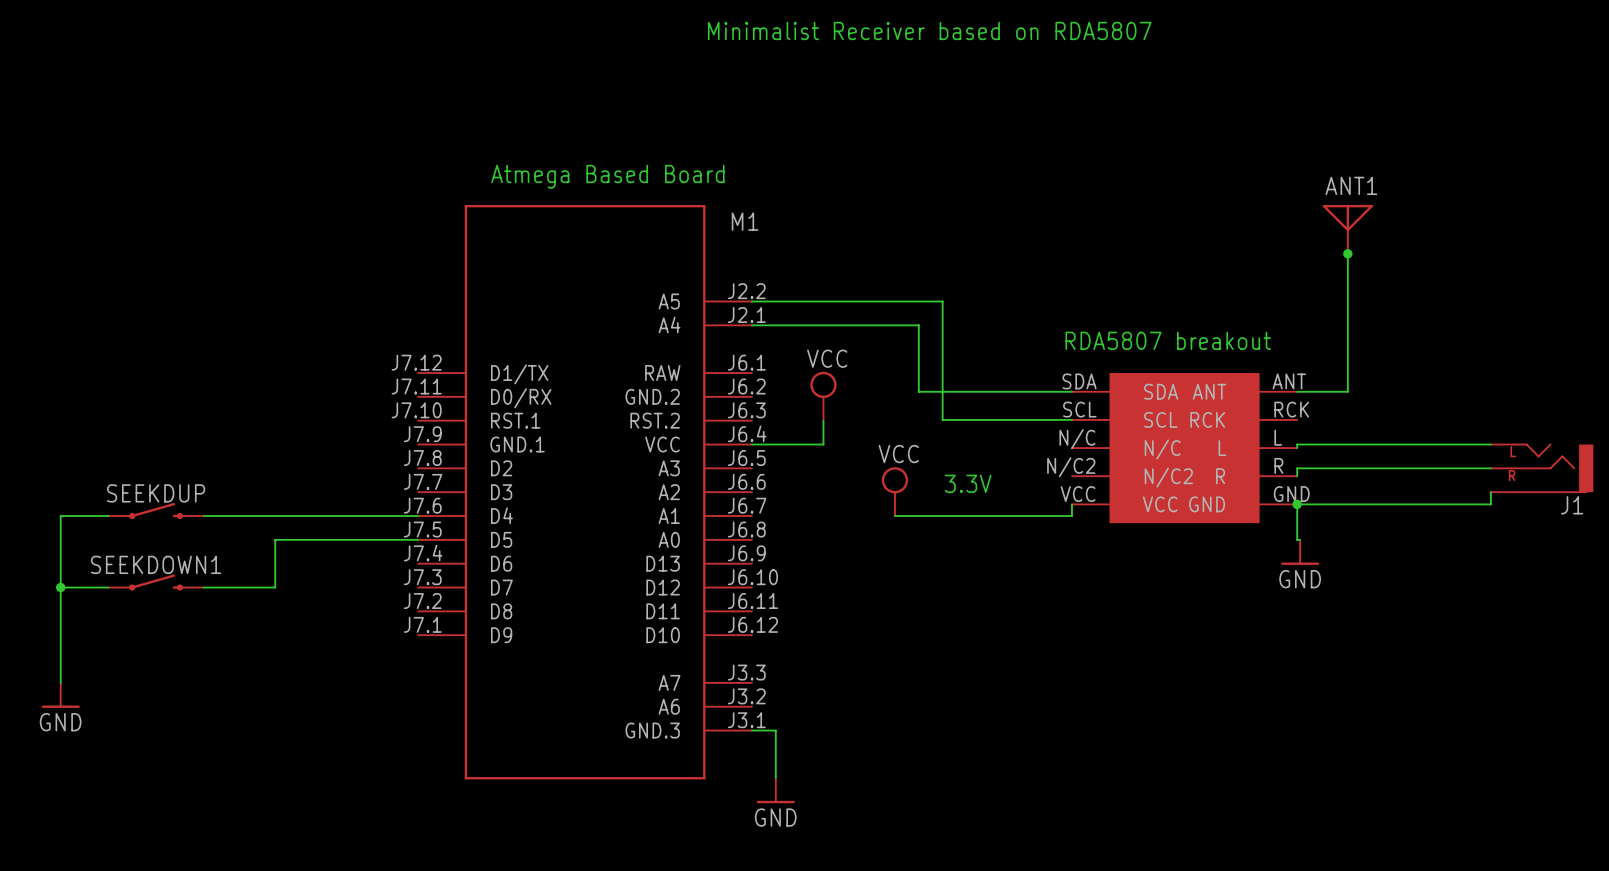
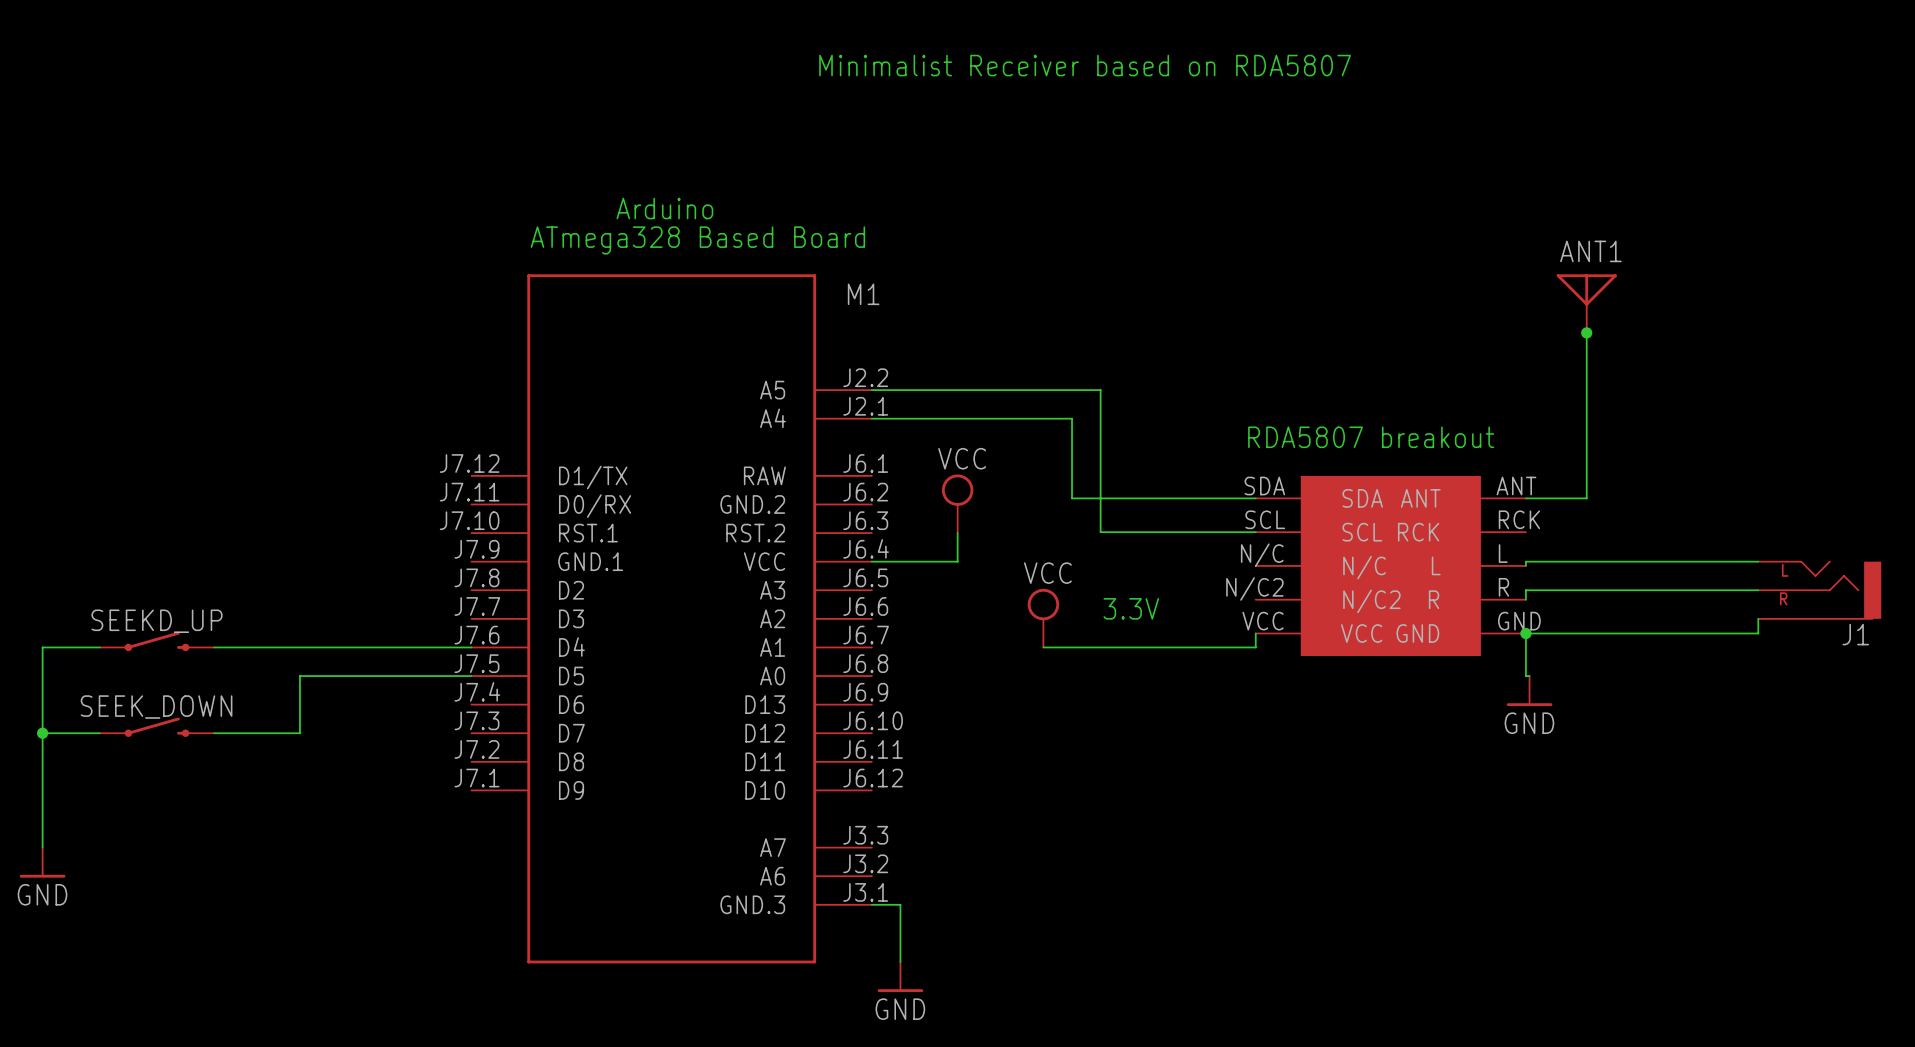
text: none -> Arduino (664, 208)
text: Atmega Based Board (607, 176) -> ATmega328 Based Board (697, 240)
SEEKDUP name: SEEKDUP (156, 493) -> SEEKD_UP (156, 621)
SEEKDOWN1 name: SEEKDOWN1 (156, 564) -> SEEK_DOWN (156, 707)

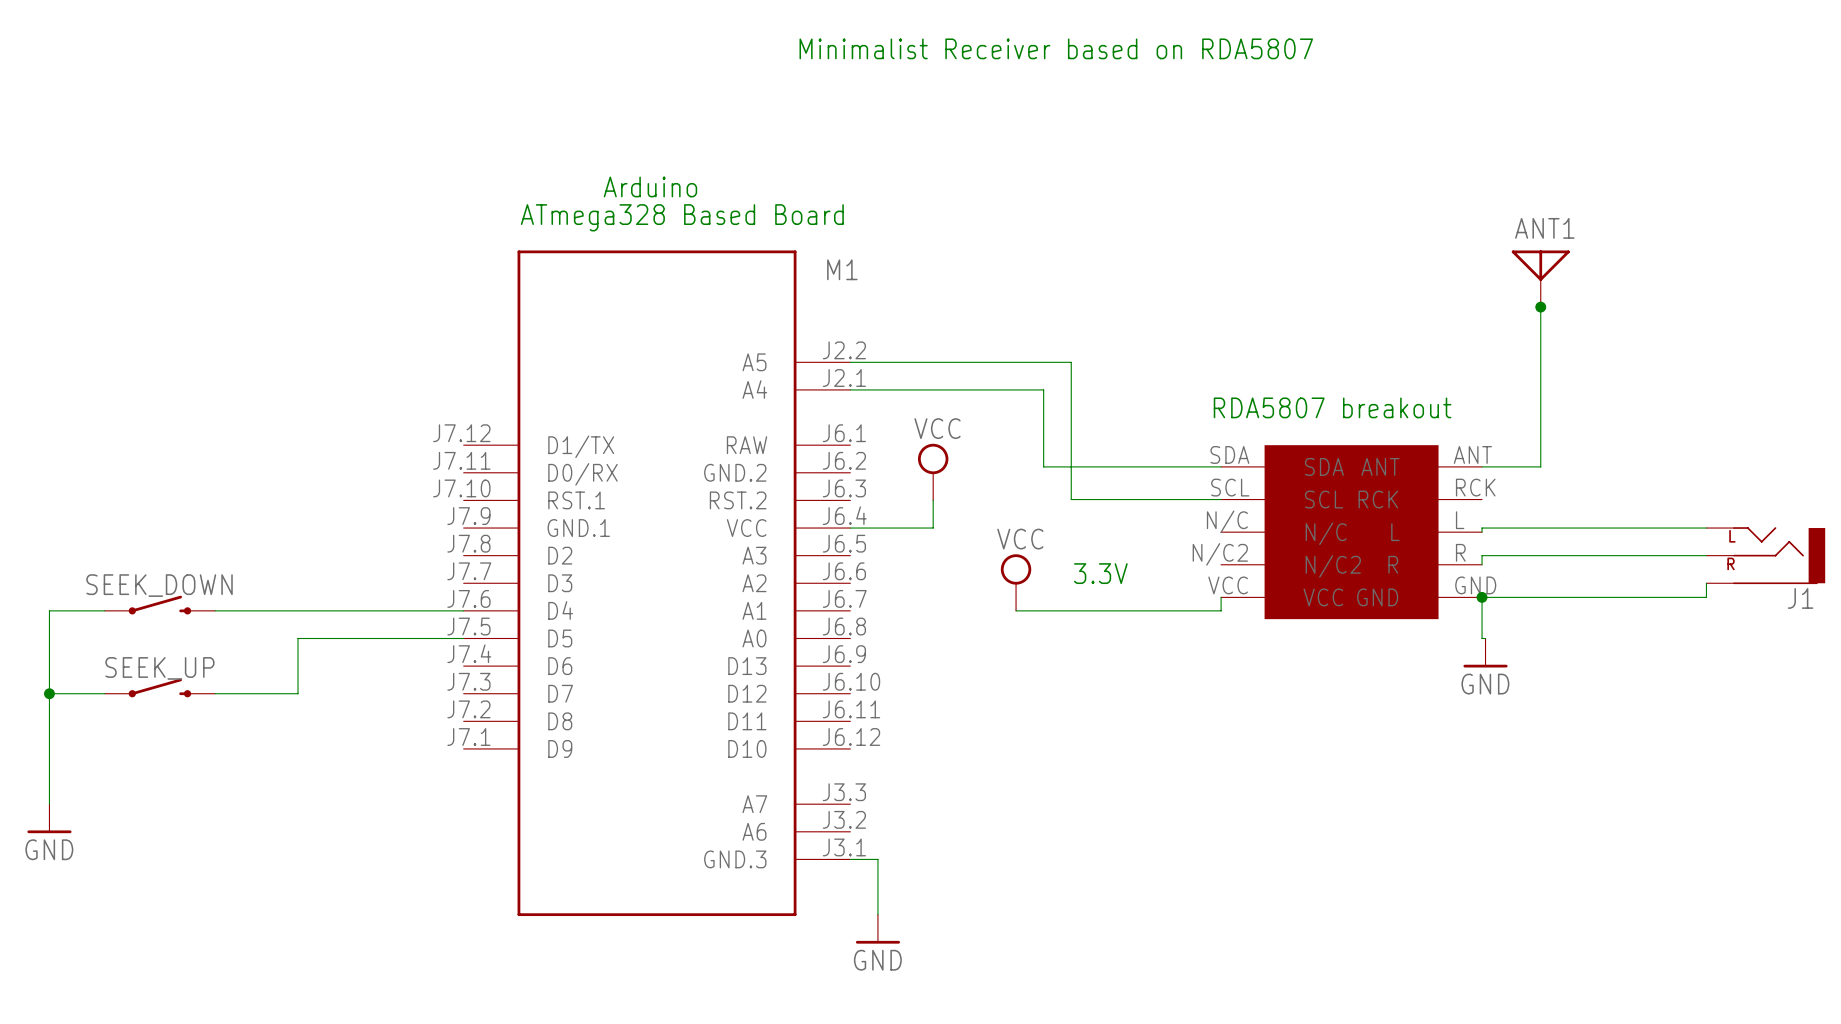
SEEKD_UP name: SEEKD_UP (156, 621) -> SEEK_DOWN (159, 585)
SEEK_DOWN name: SEEK_DOWN (156, 707) -> SEEK_UP (159, 668)

